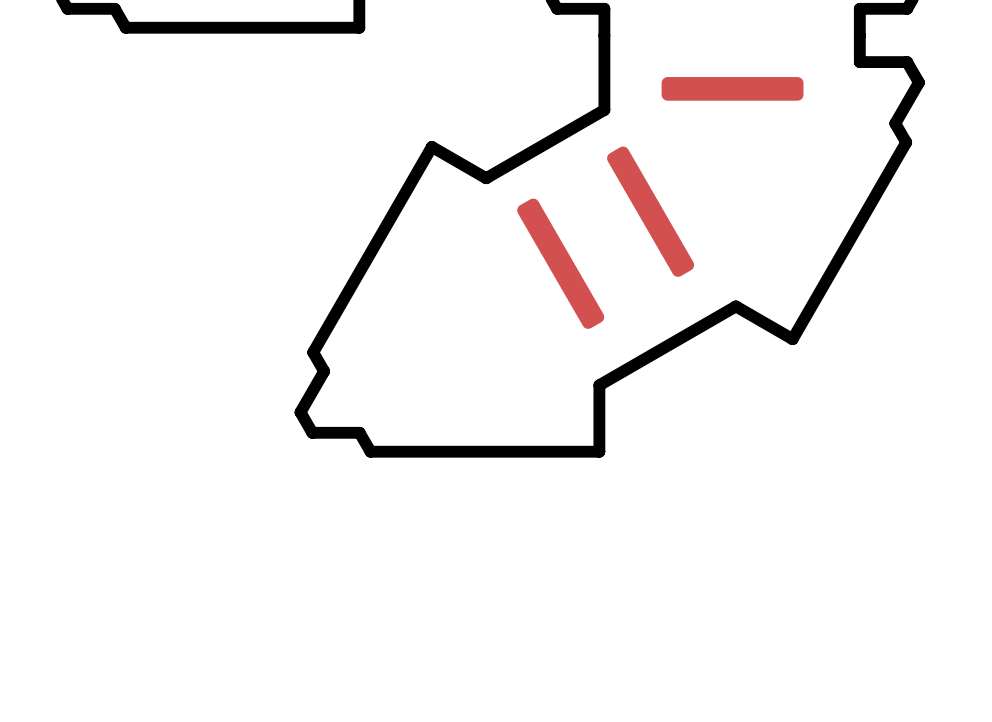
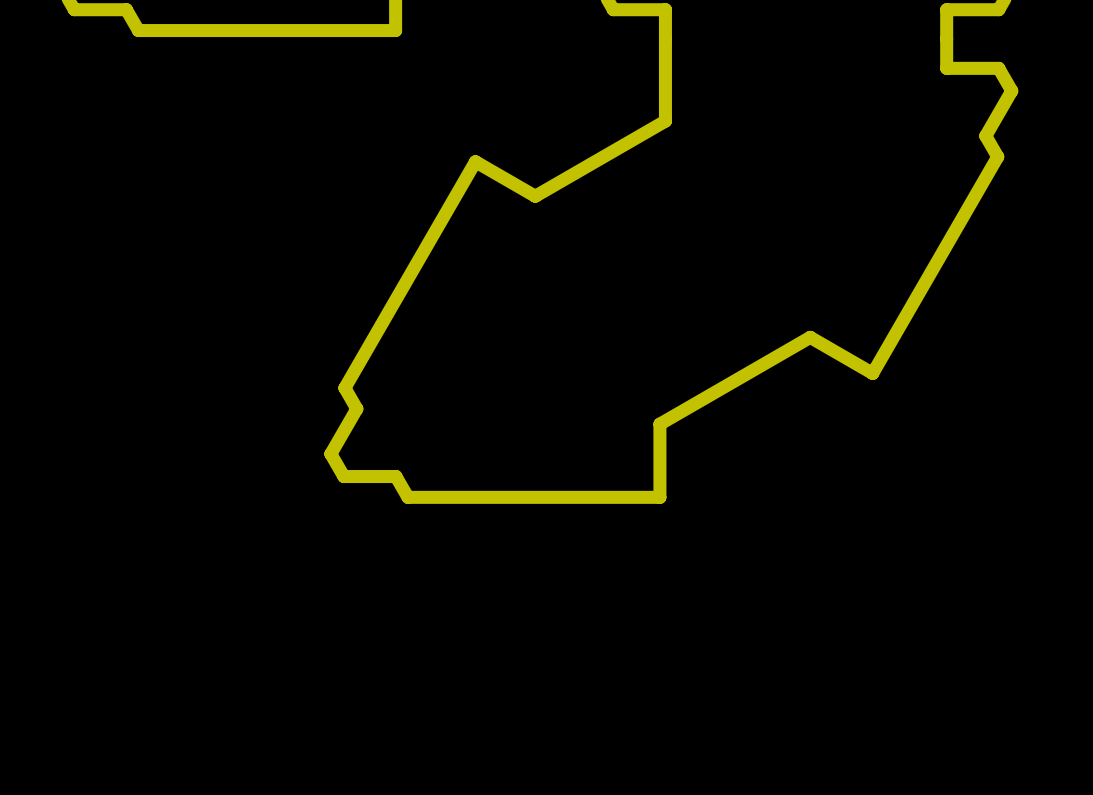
part: (732, 88) -> none
part: (650, 211) -> none
part: (560, 263) -> none

